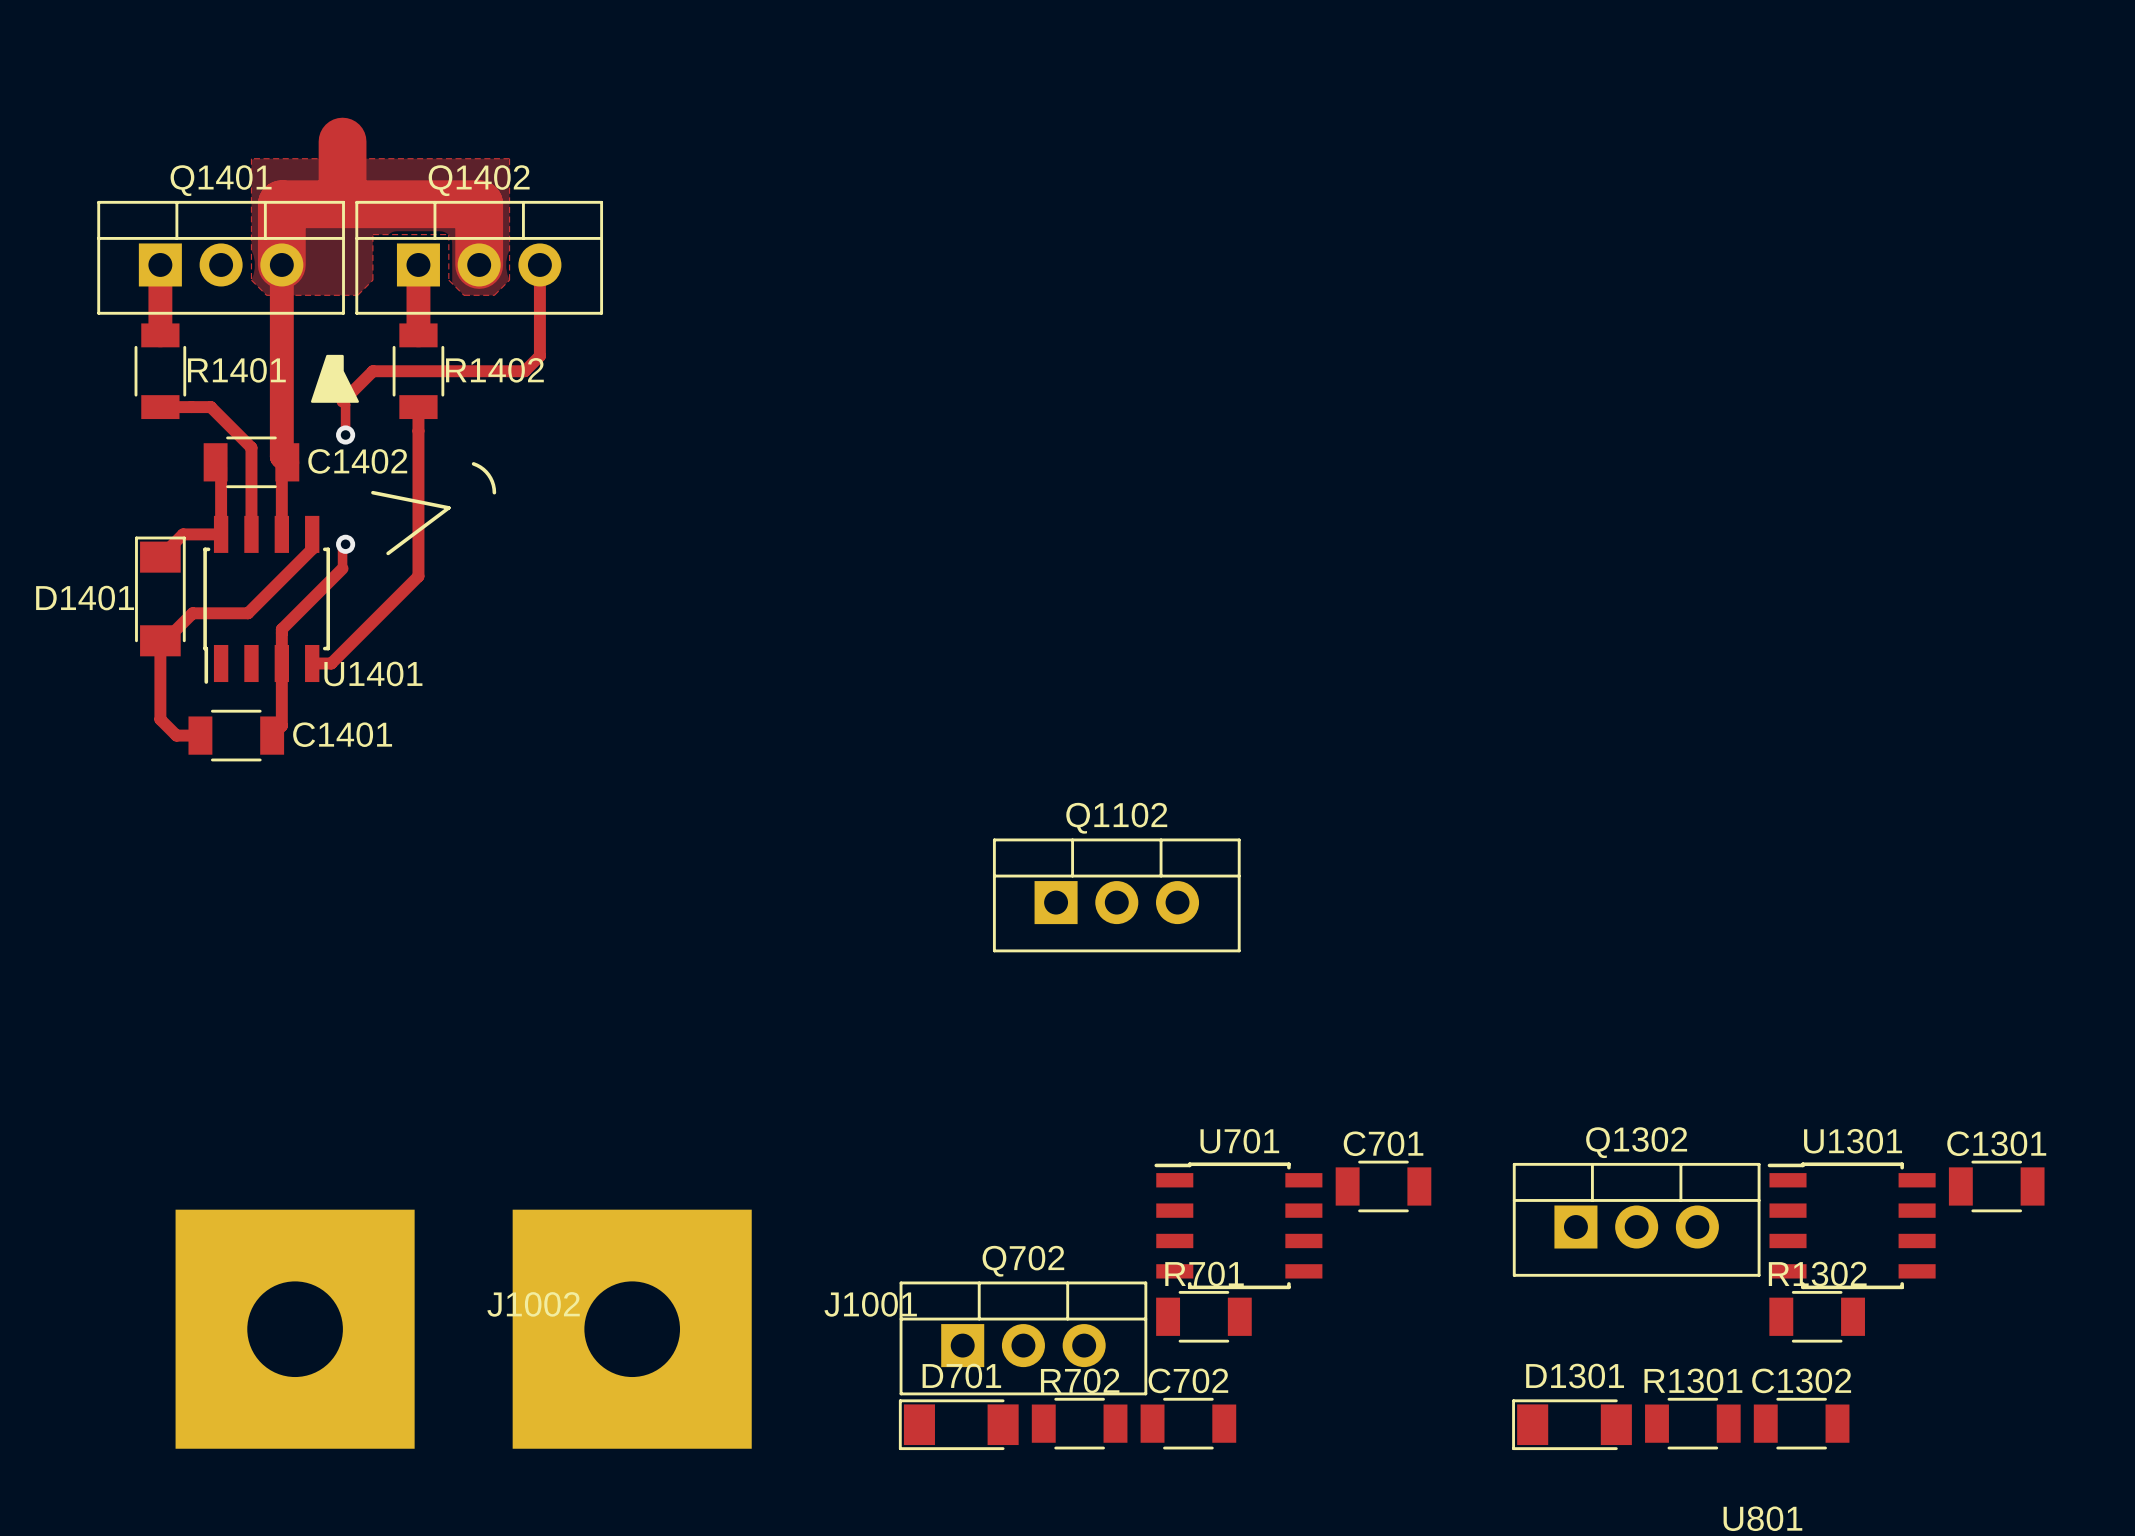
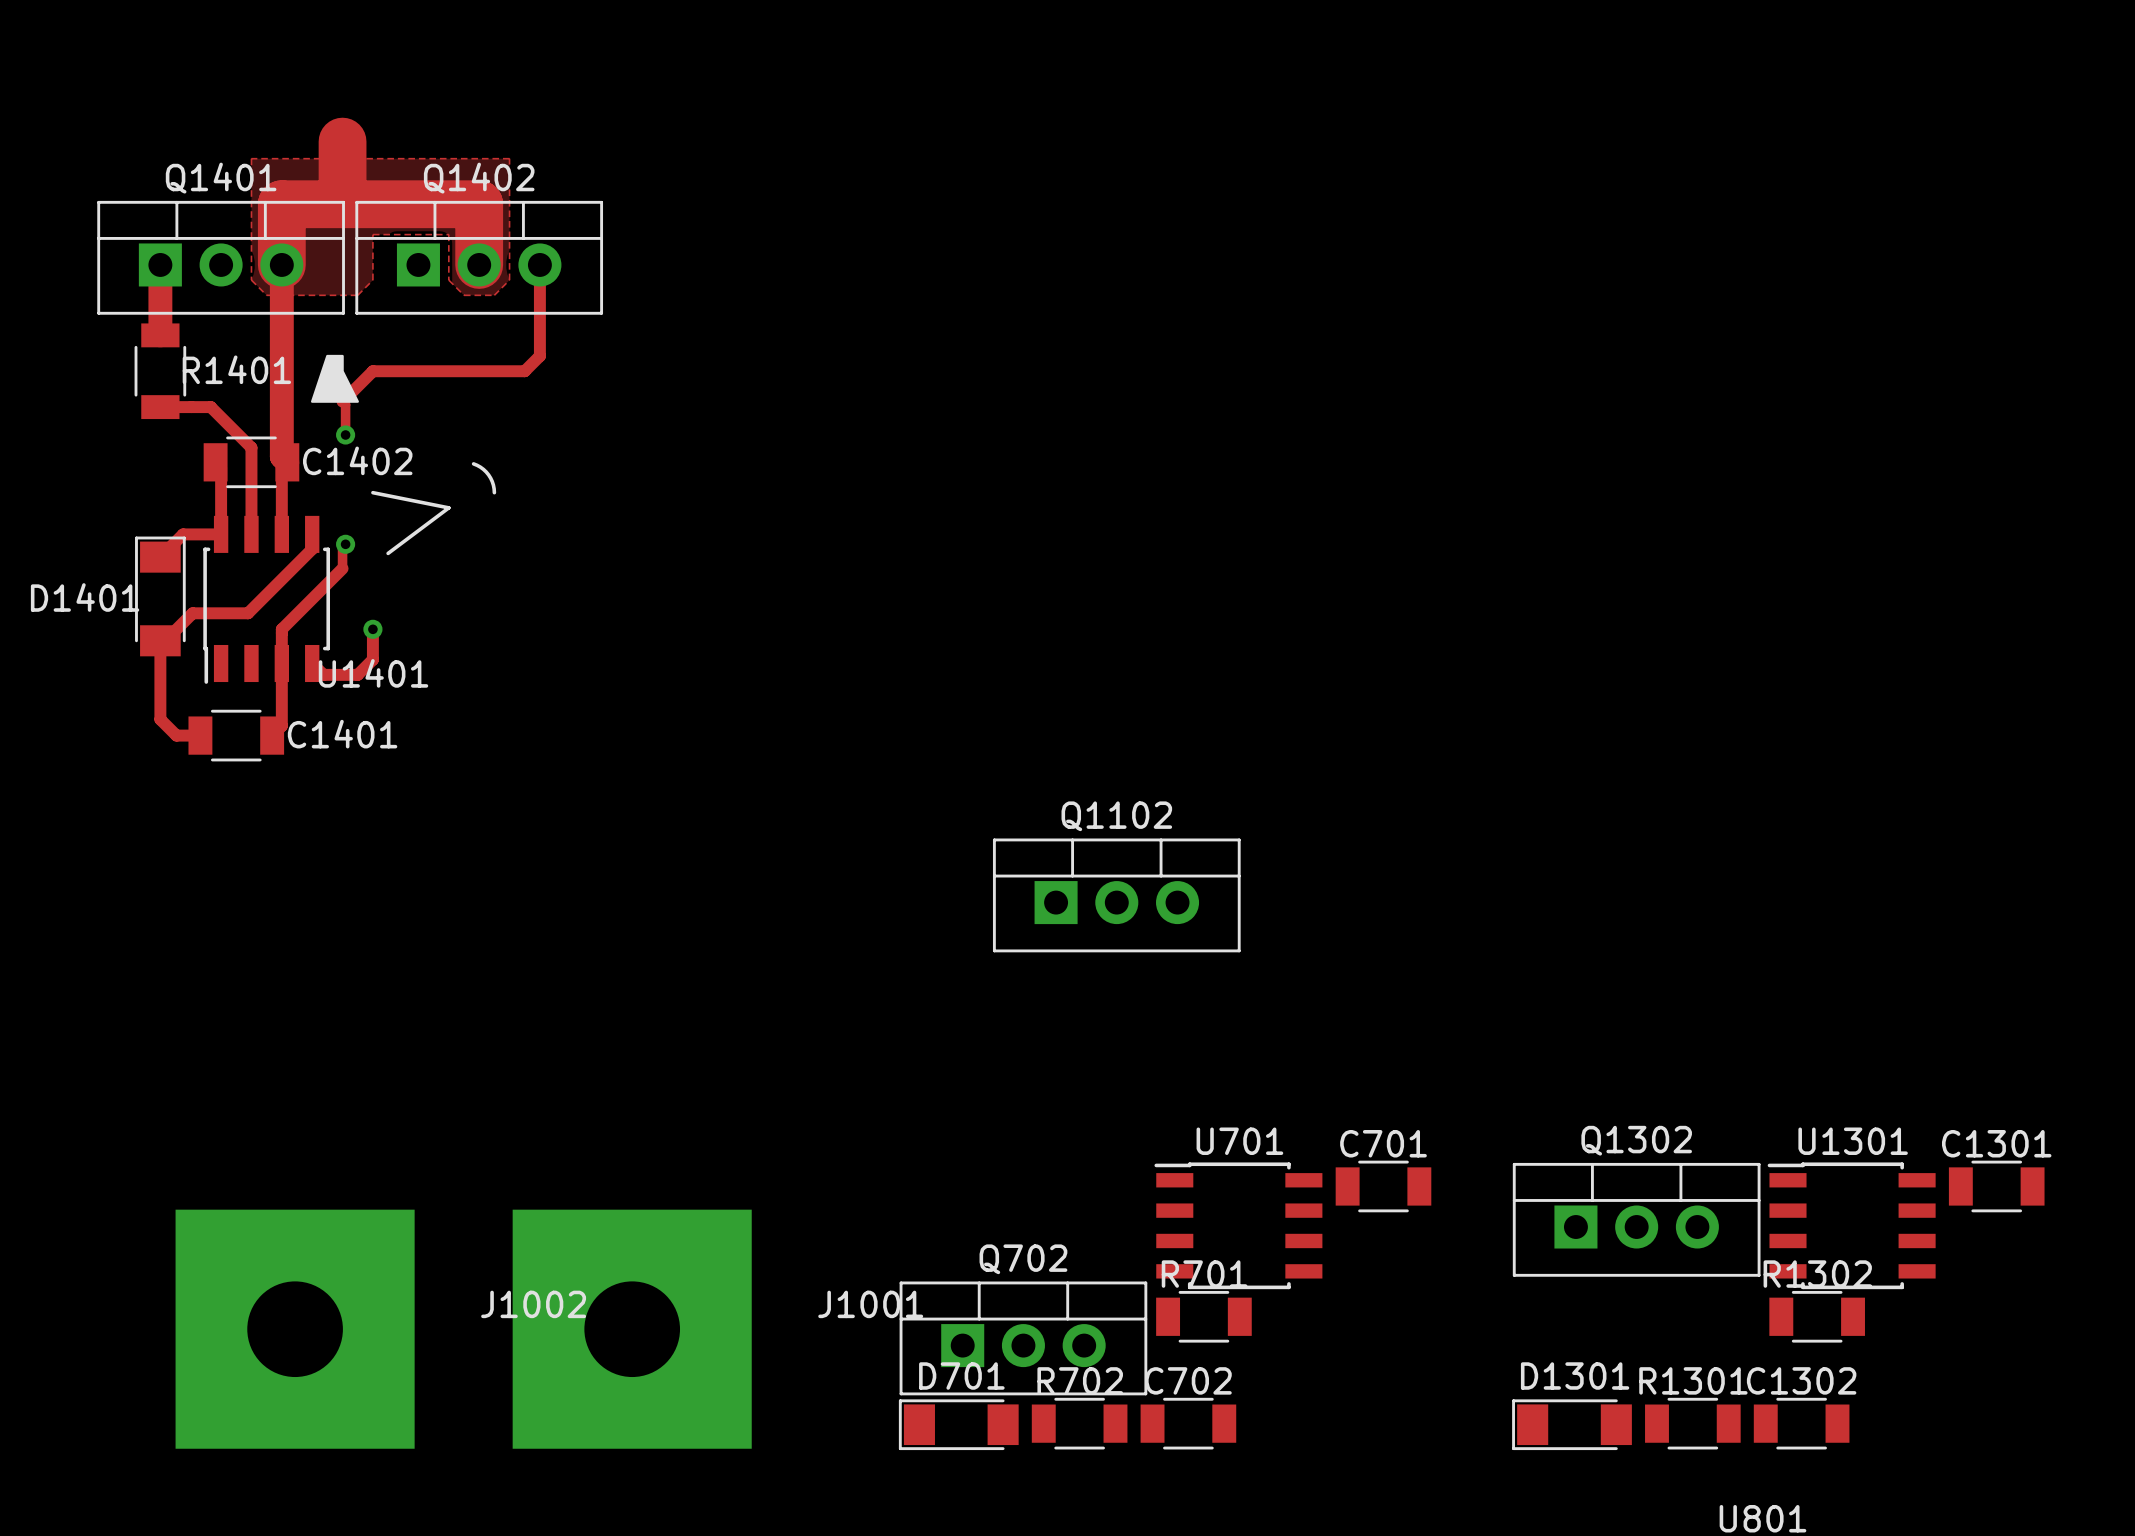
track: (418, 264) (418, 335) -> none
R1402: (418, 371) -> none
track: (418, 407) (418, 576) (331, 663) (312, 663) -> (372, 629) (372, 659) (357, 674) (323, 674) (312, 663)
via: none -> (372, 629)

